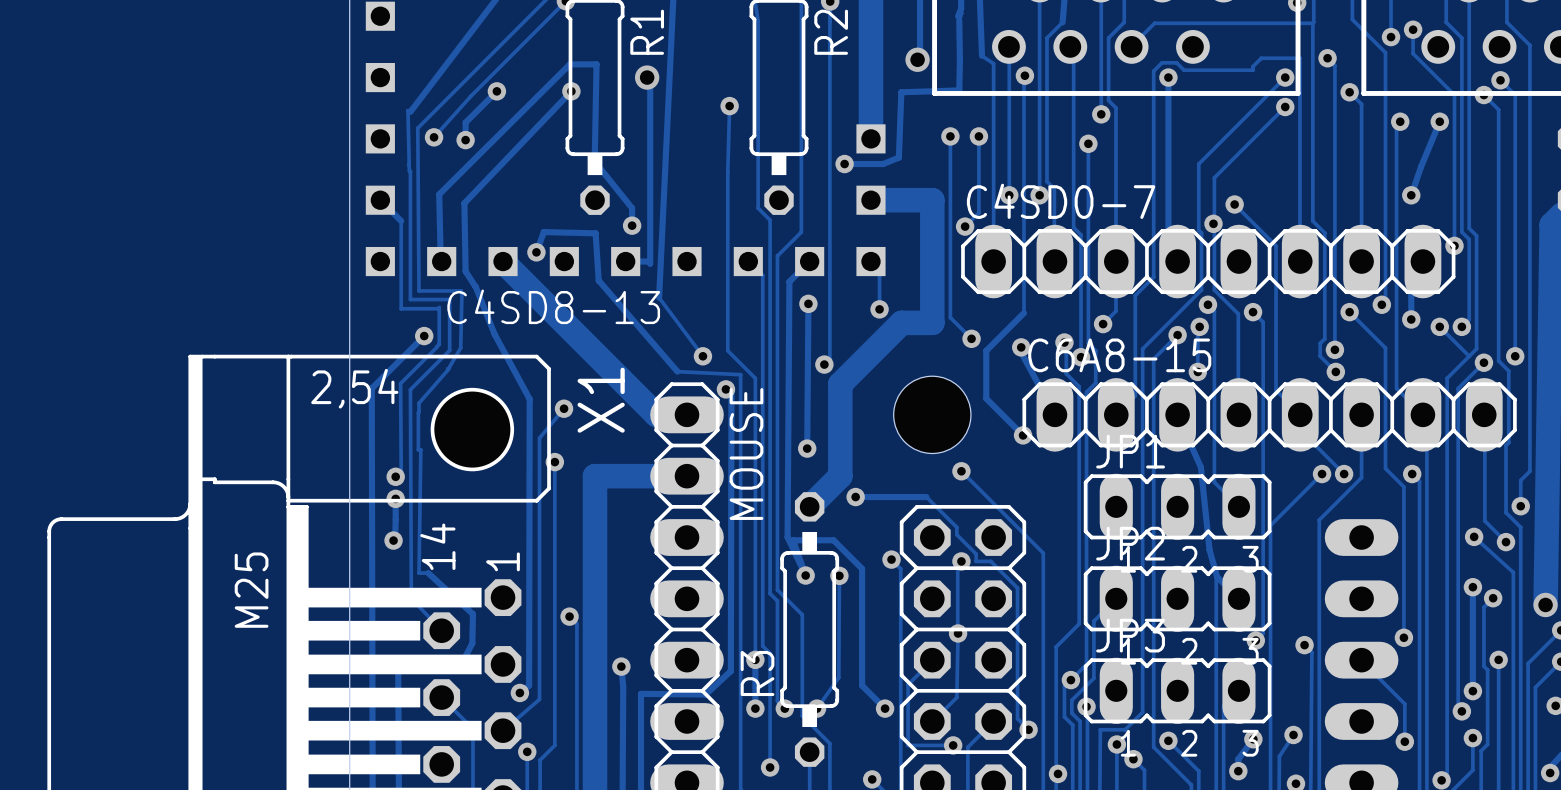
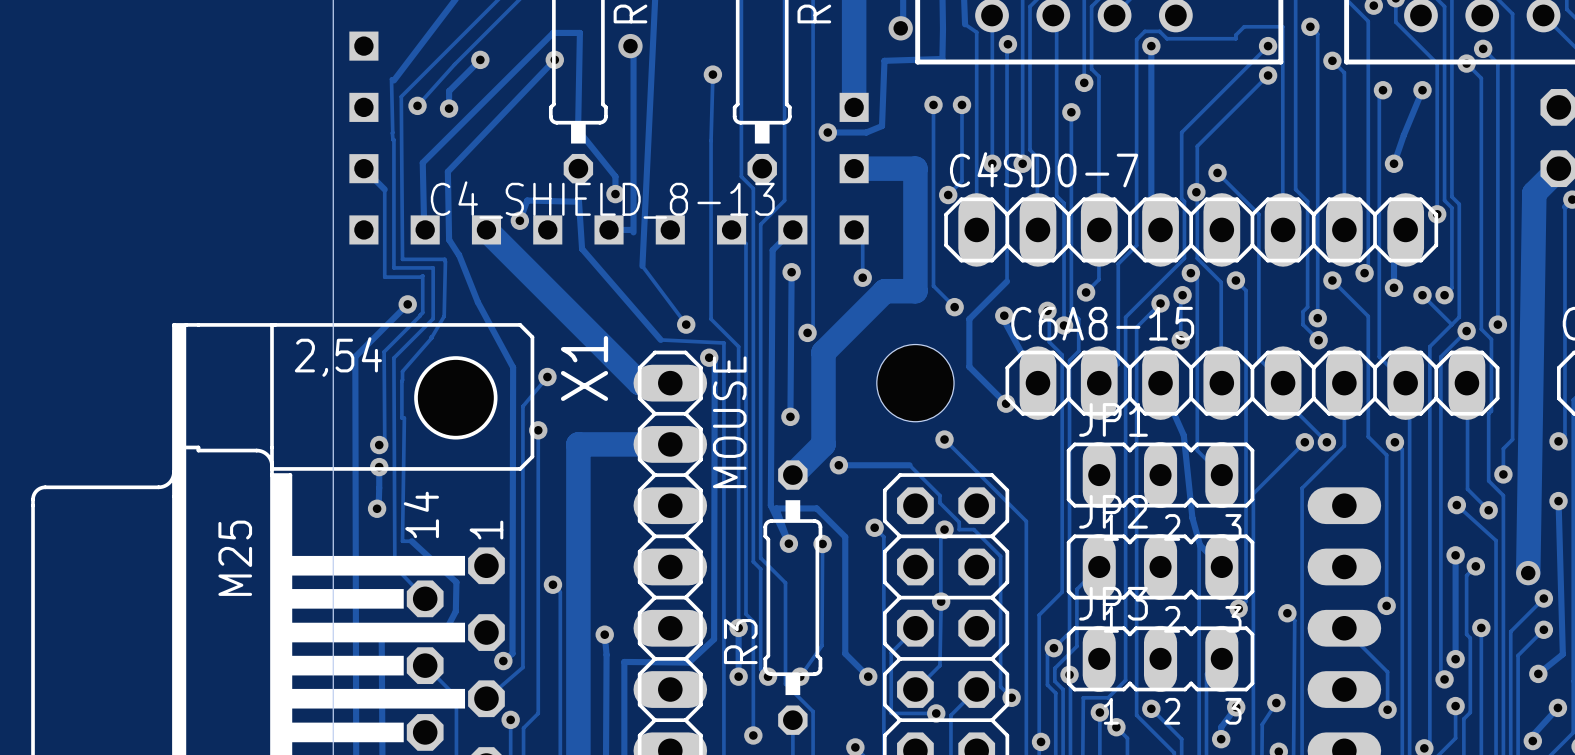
C4SD8-13 name: C4SD8-13 (553, 306) -> C4_SHIELD_8-13 (602, 200)

